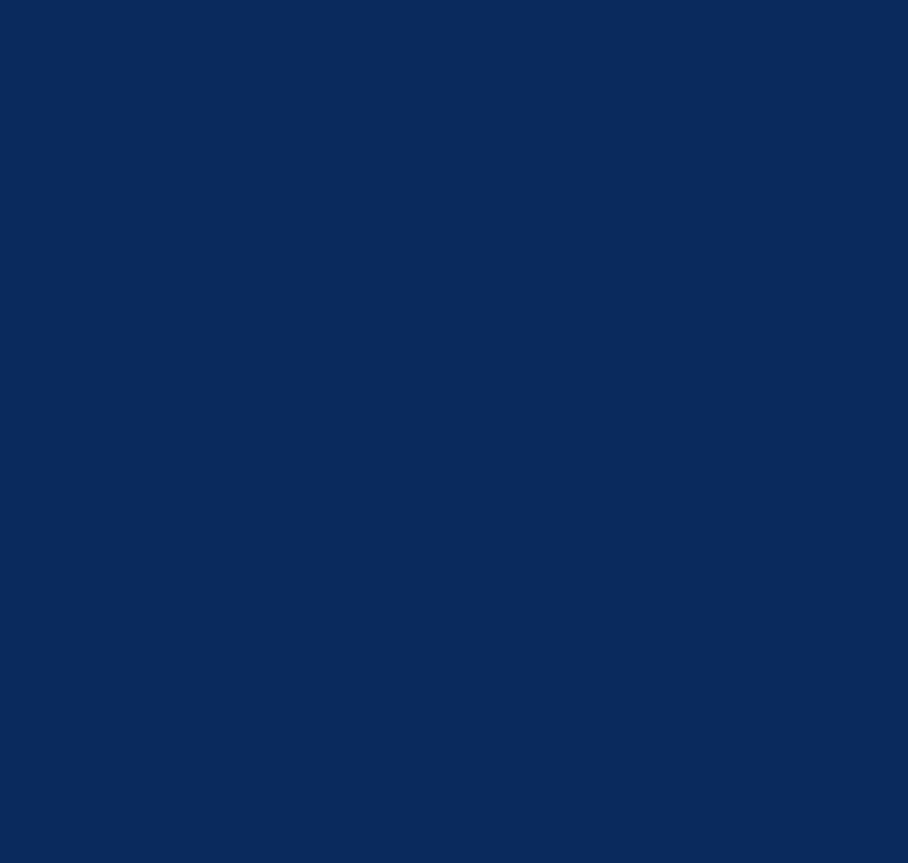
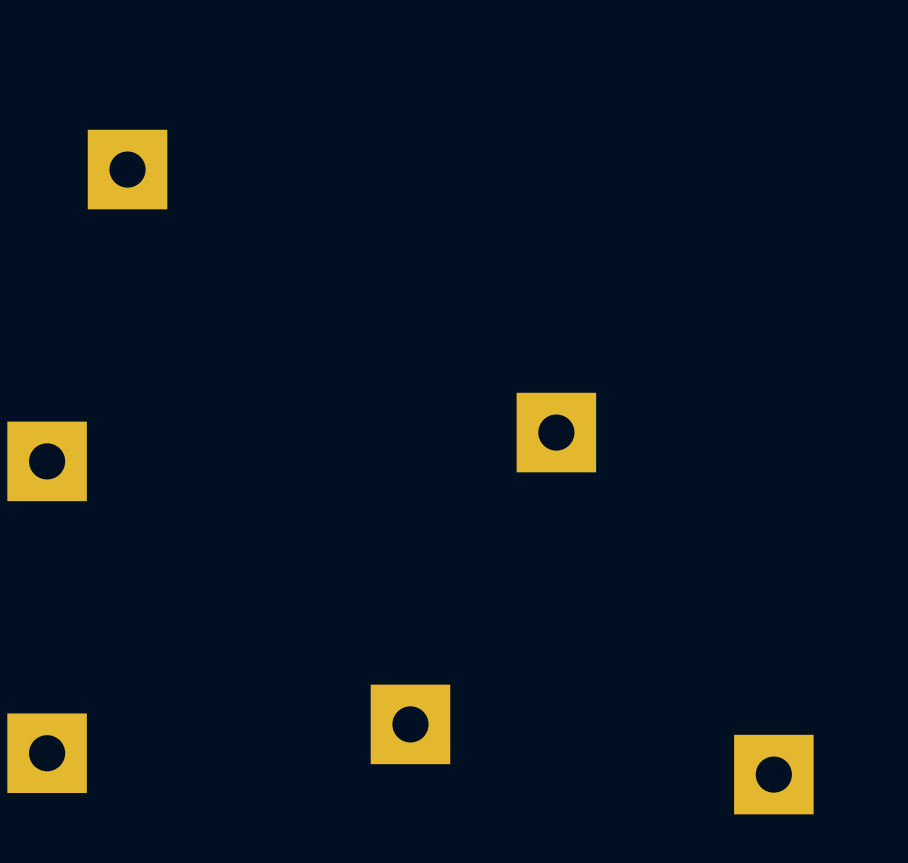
part: none -> (127, 169)
part: none -> (556, 432)
part: none -> (47, 461)
part: none -> (410, 724)
part: none -> (47, 753)
part: none -> (773, 774)

